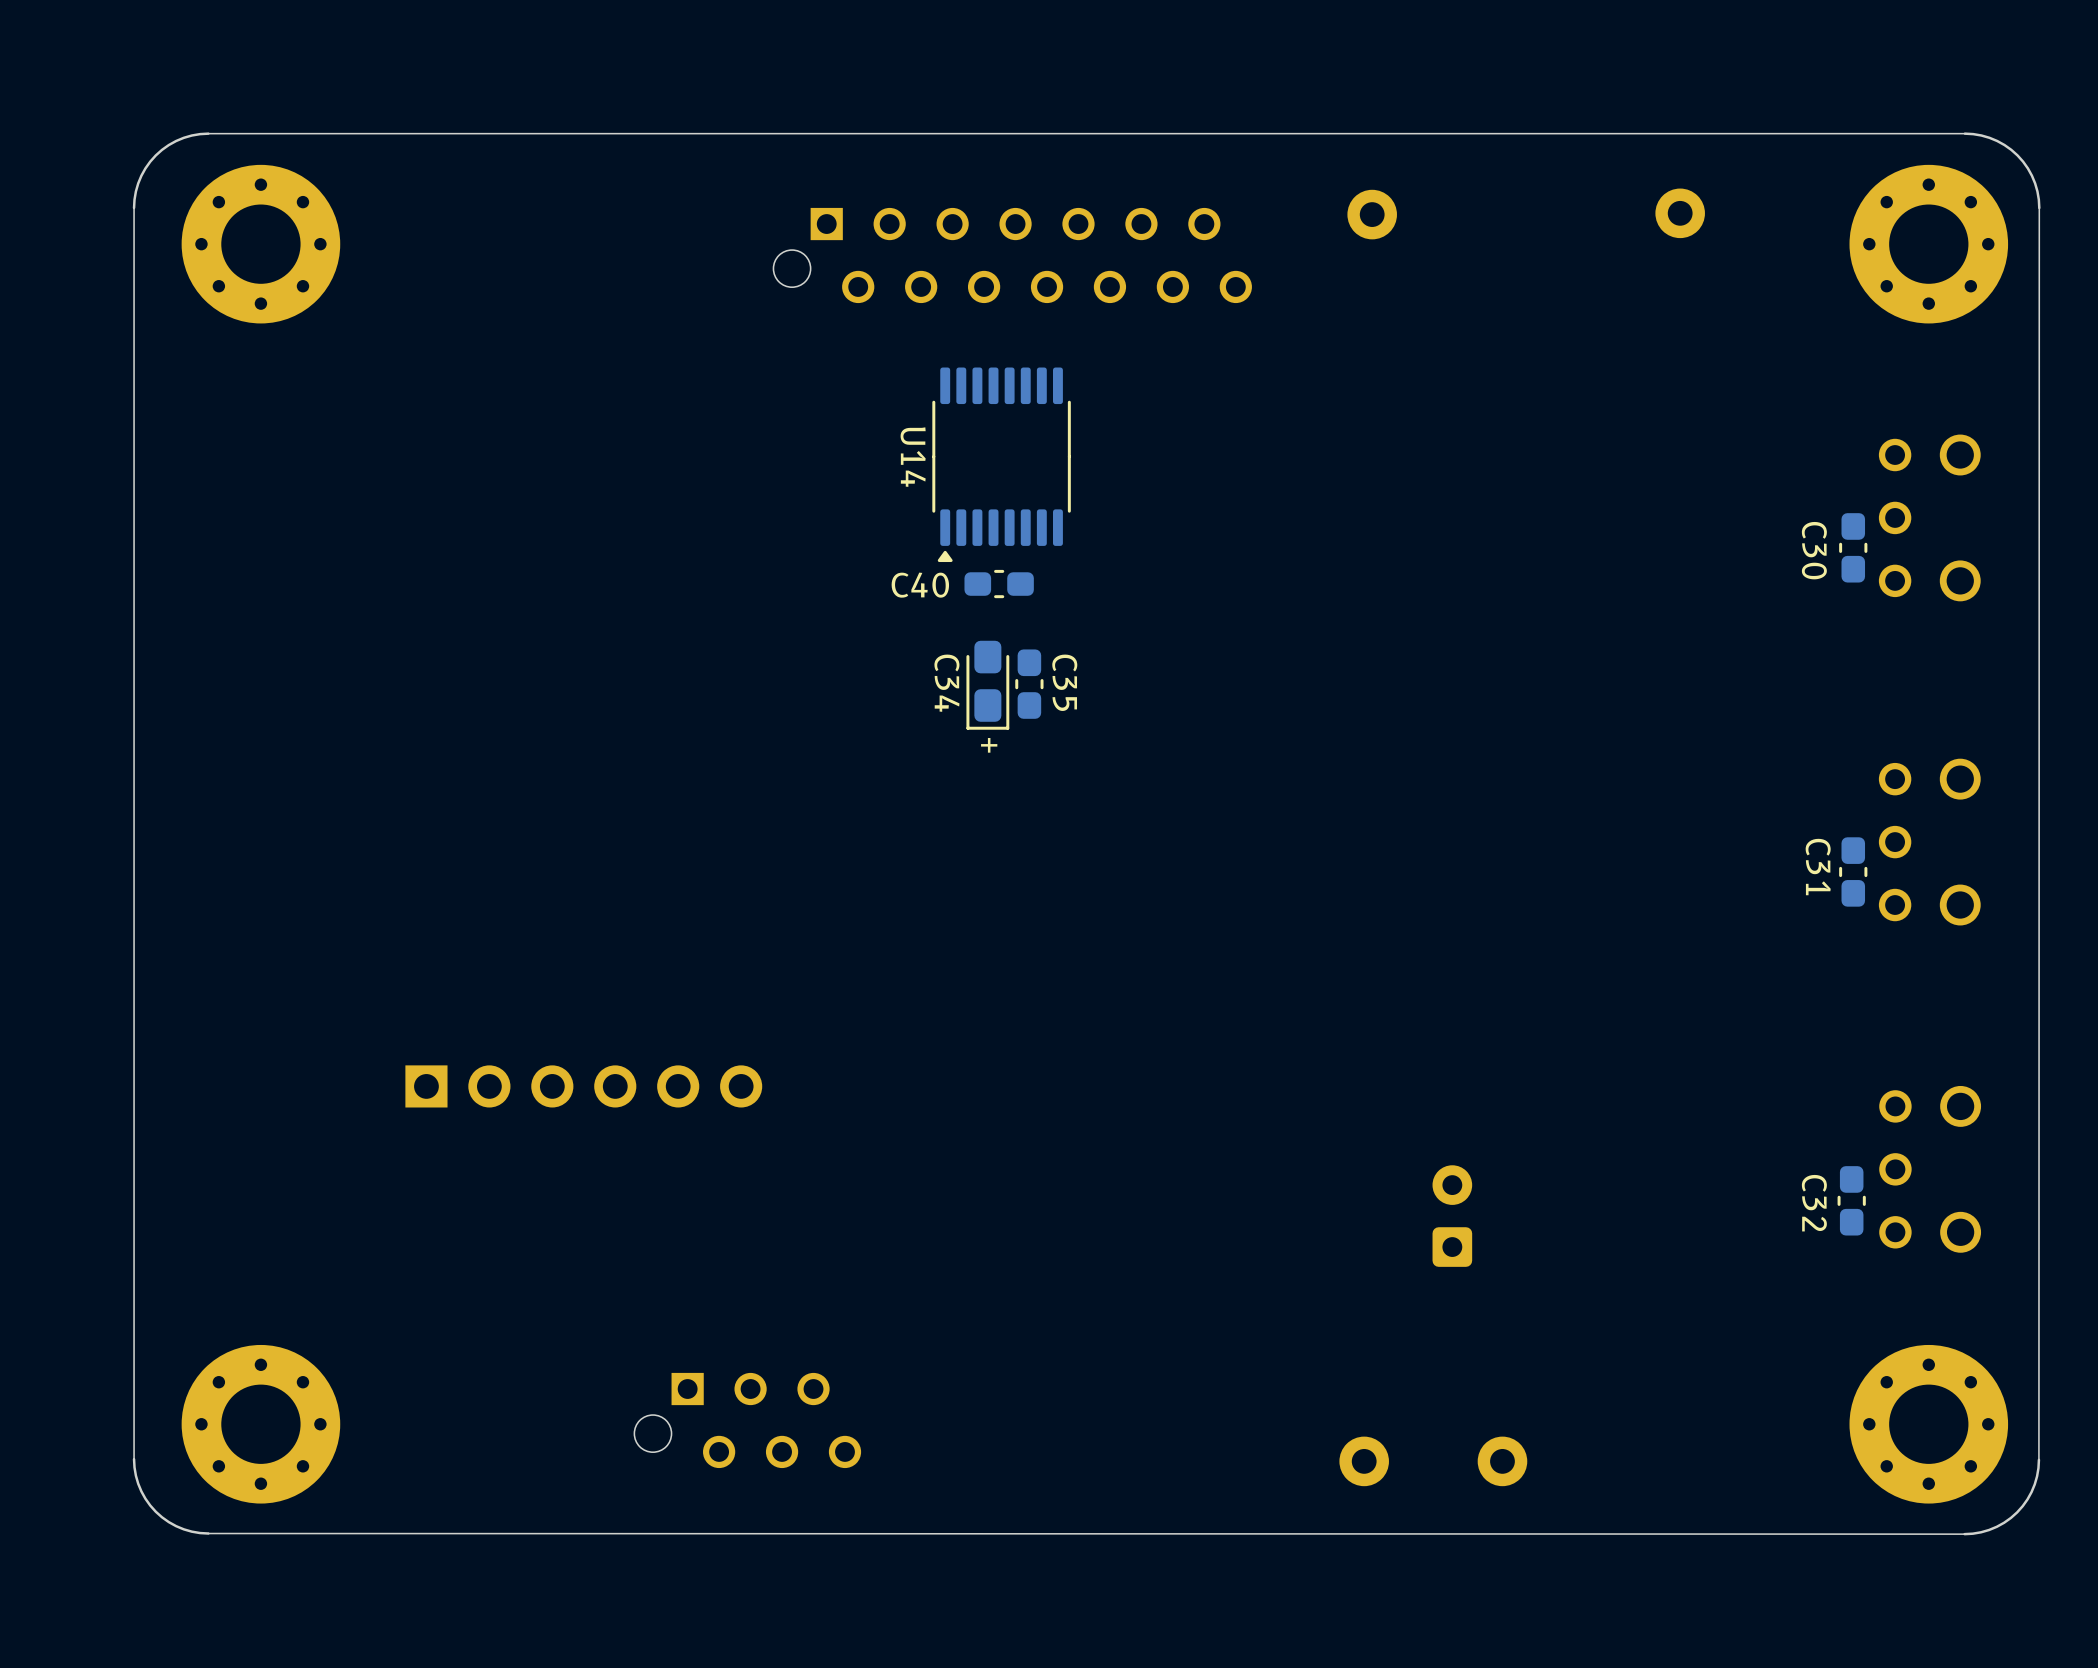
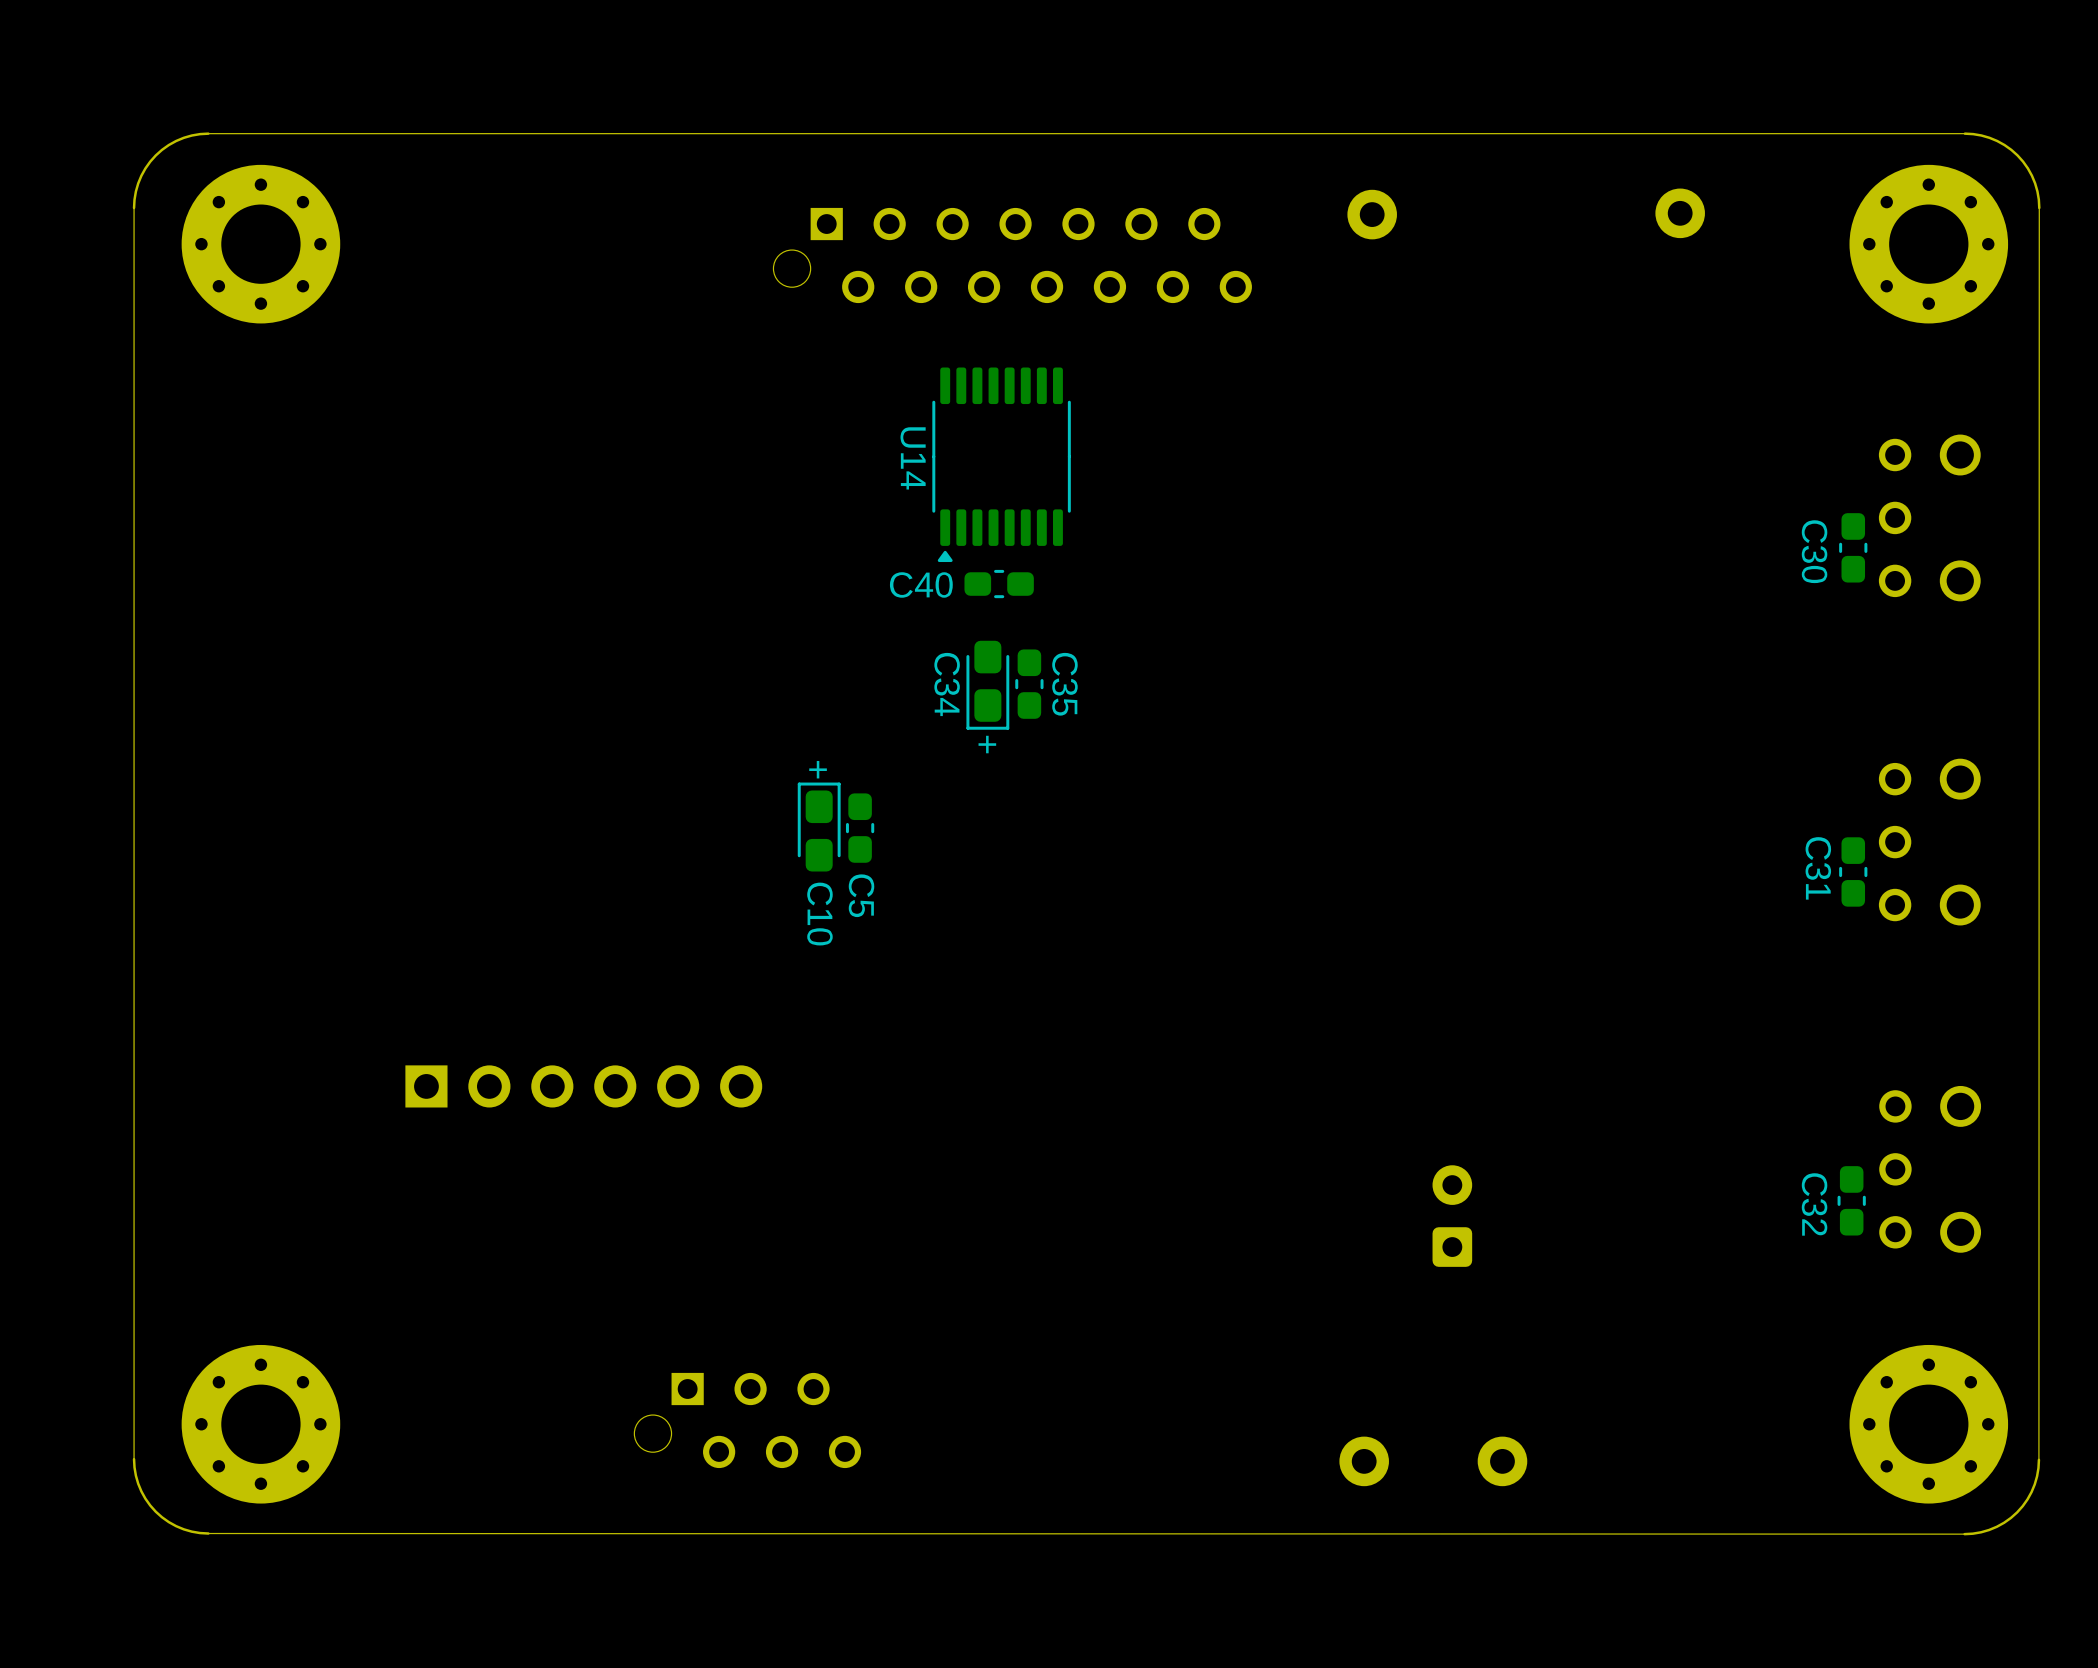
text: none -> + (818, 769)
C10: none -> (819, 827)
C5: none -> (860, 828)

